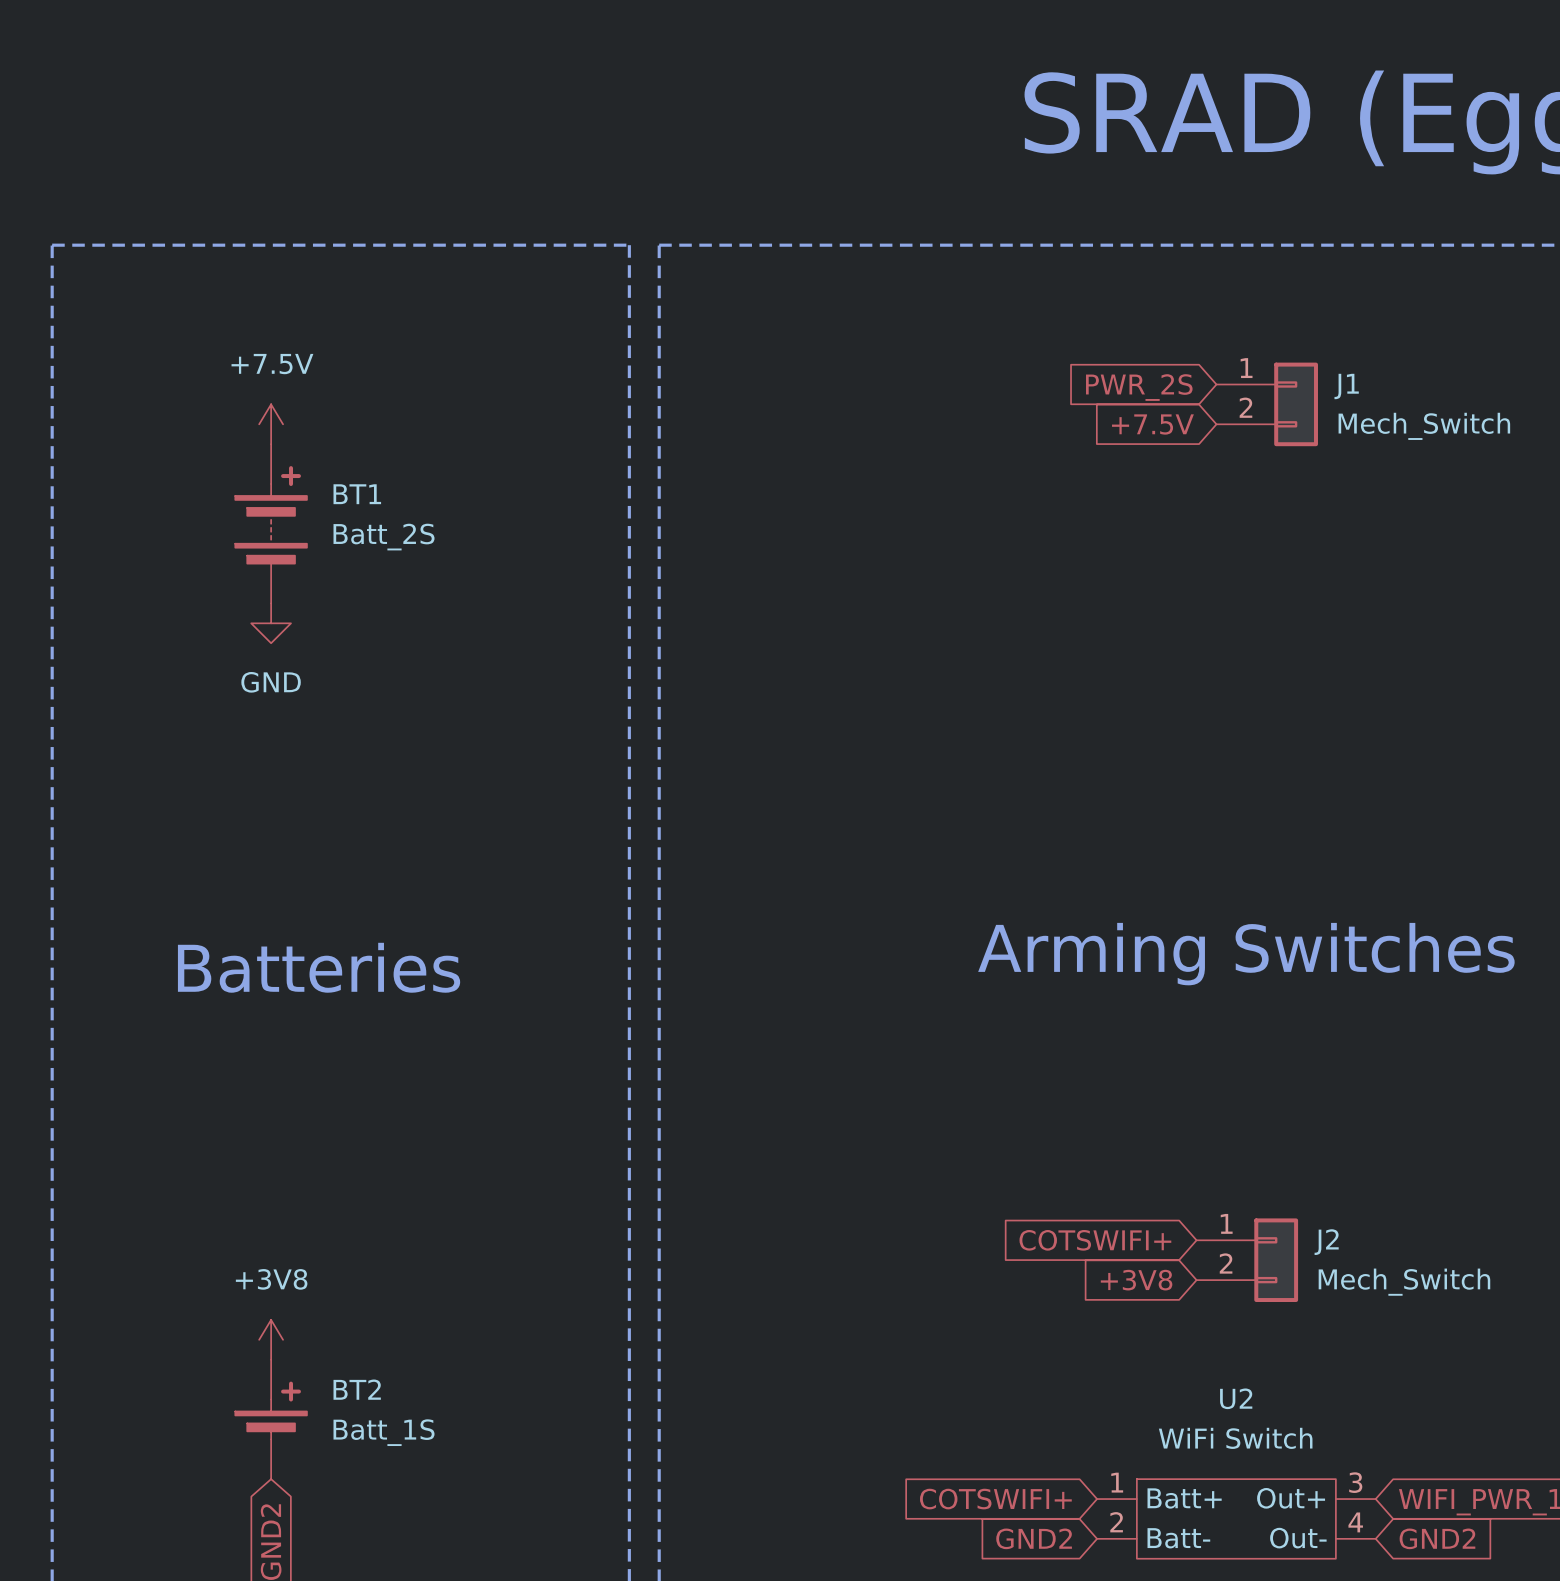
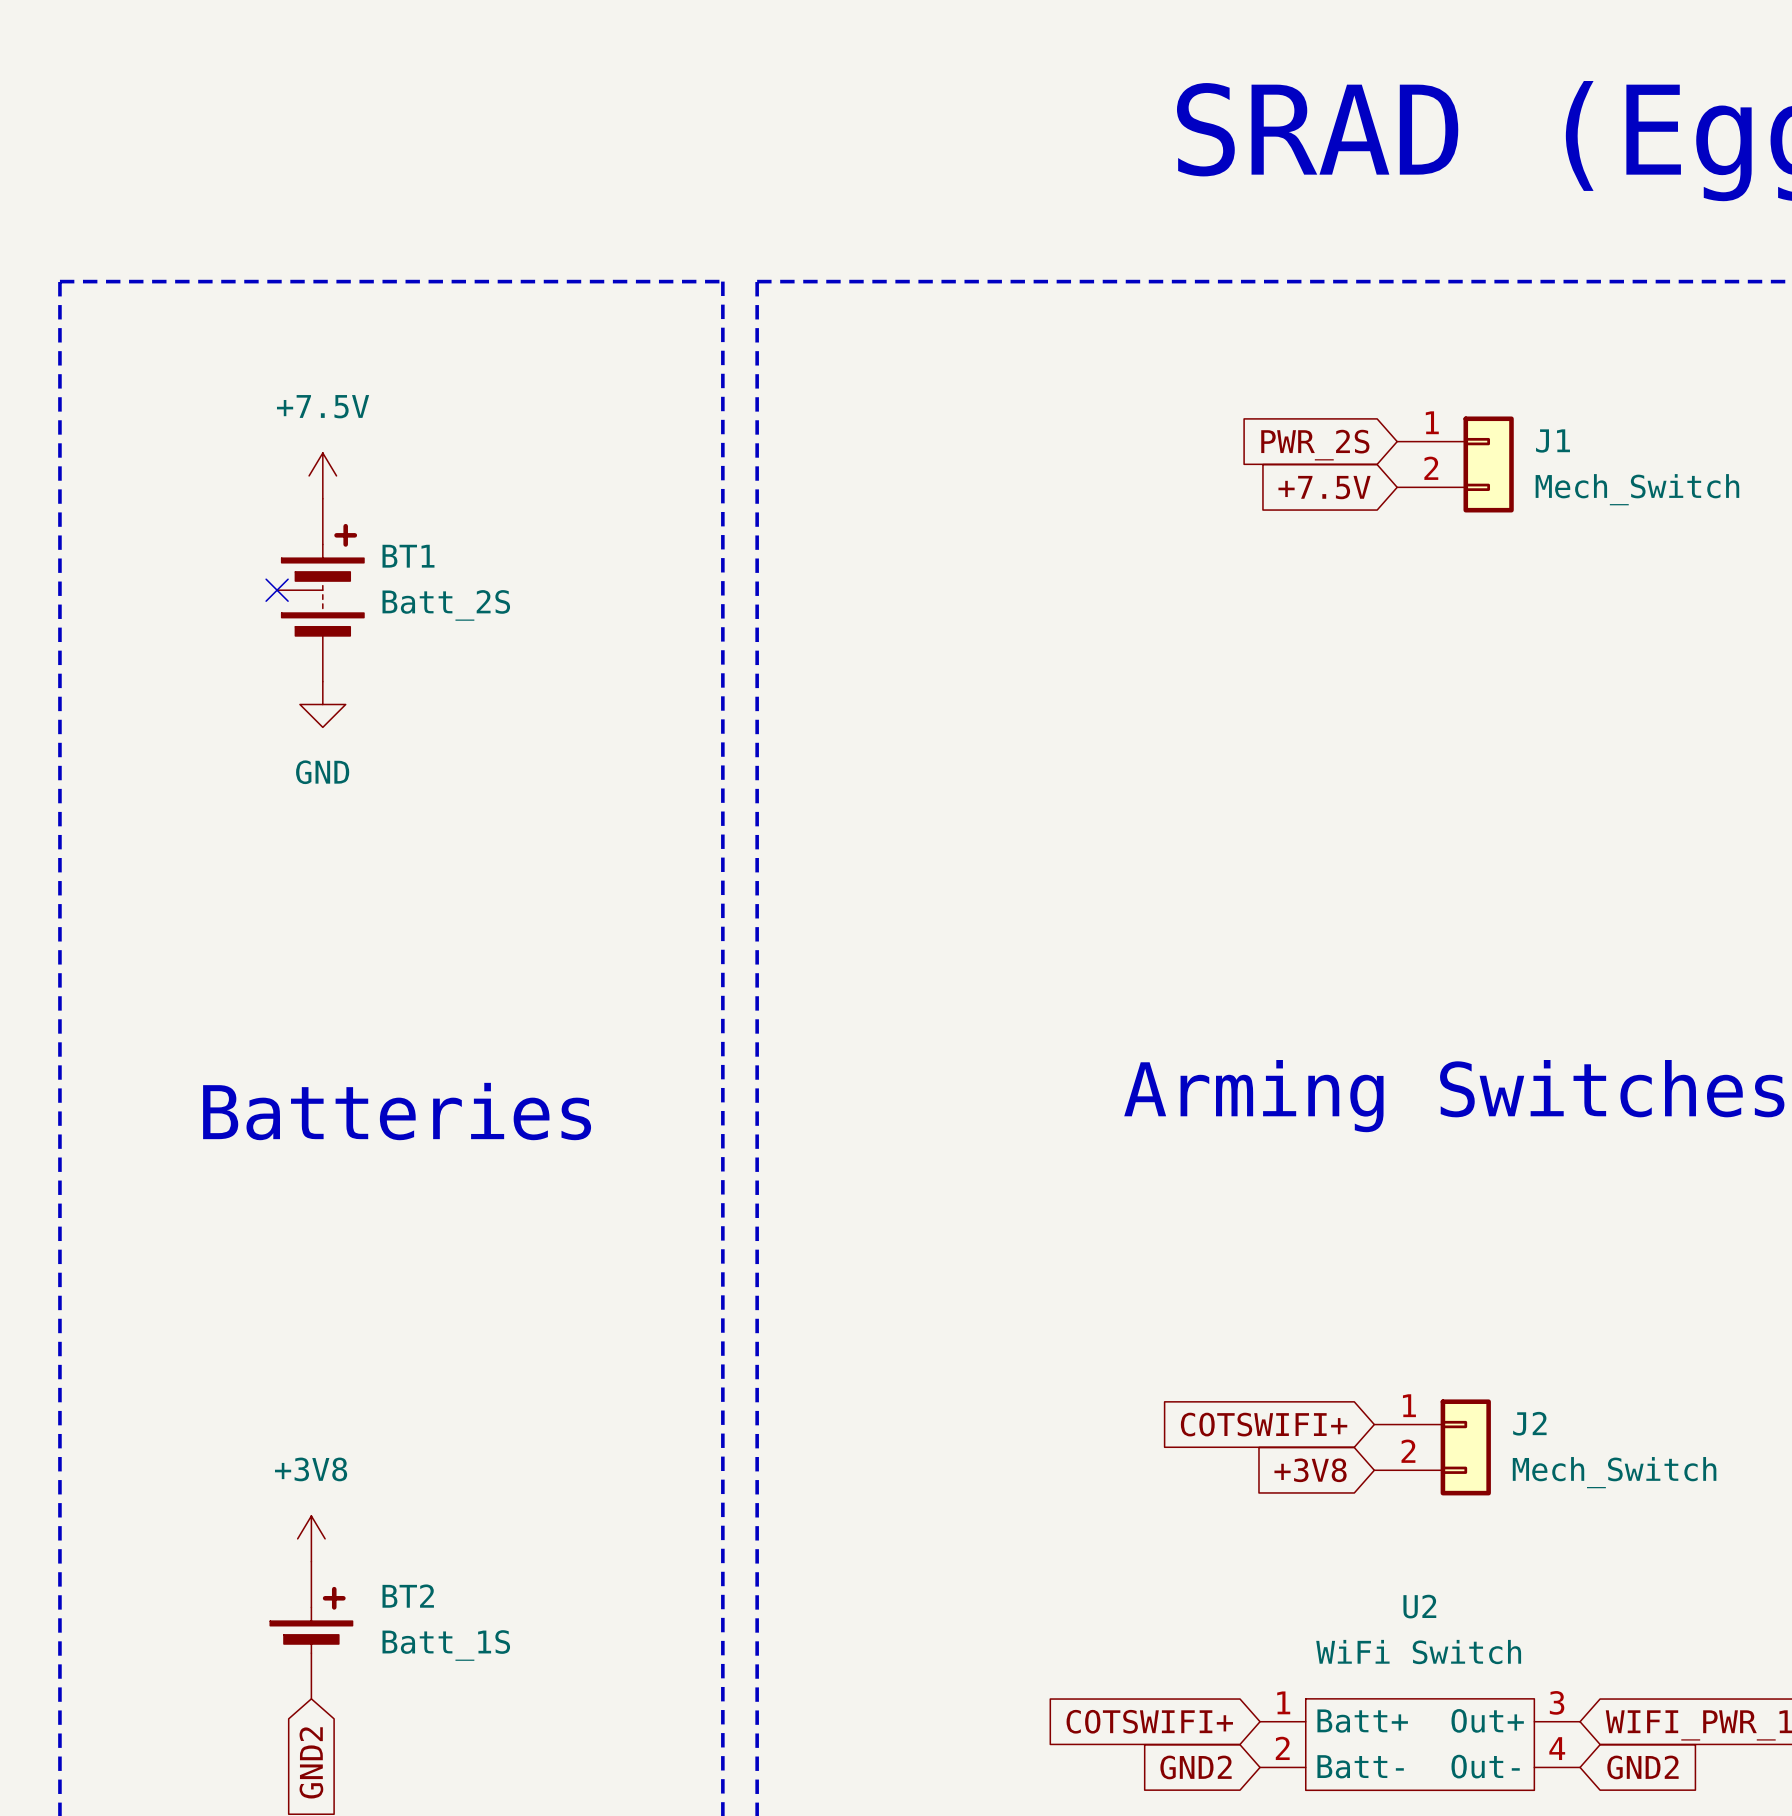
power symbol position: +7.5V (271, 424) -> +7.5V (322, 475)
BT1 symbol: [235, 444, 307, 604] -> [277, 498, 364, 682]
no-connect mark: none -> (277, 590)
power symbol position: GND (271, 623) -> GND (322, 704)

